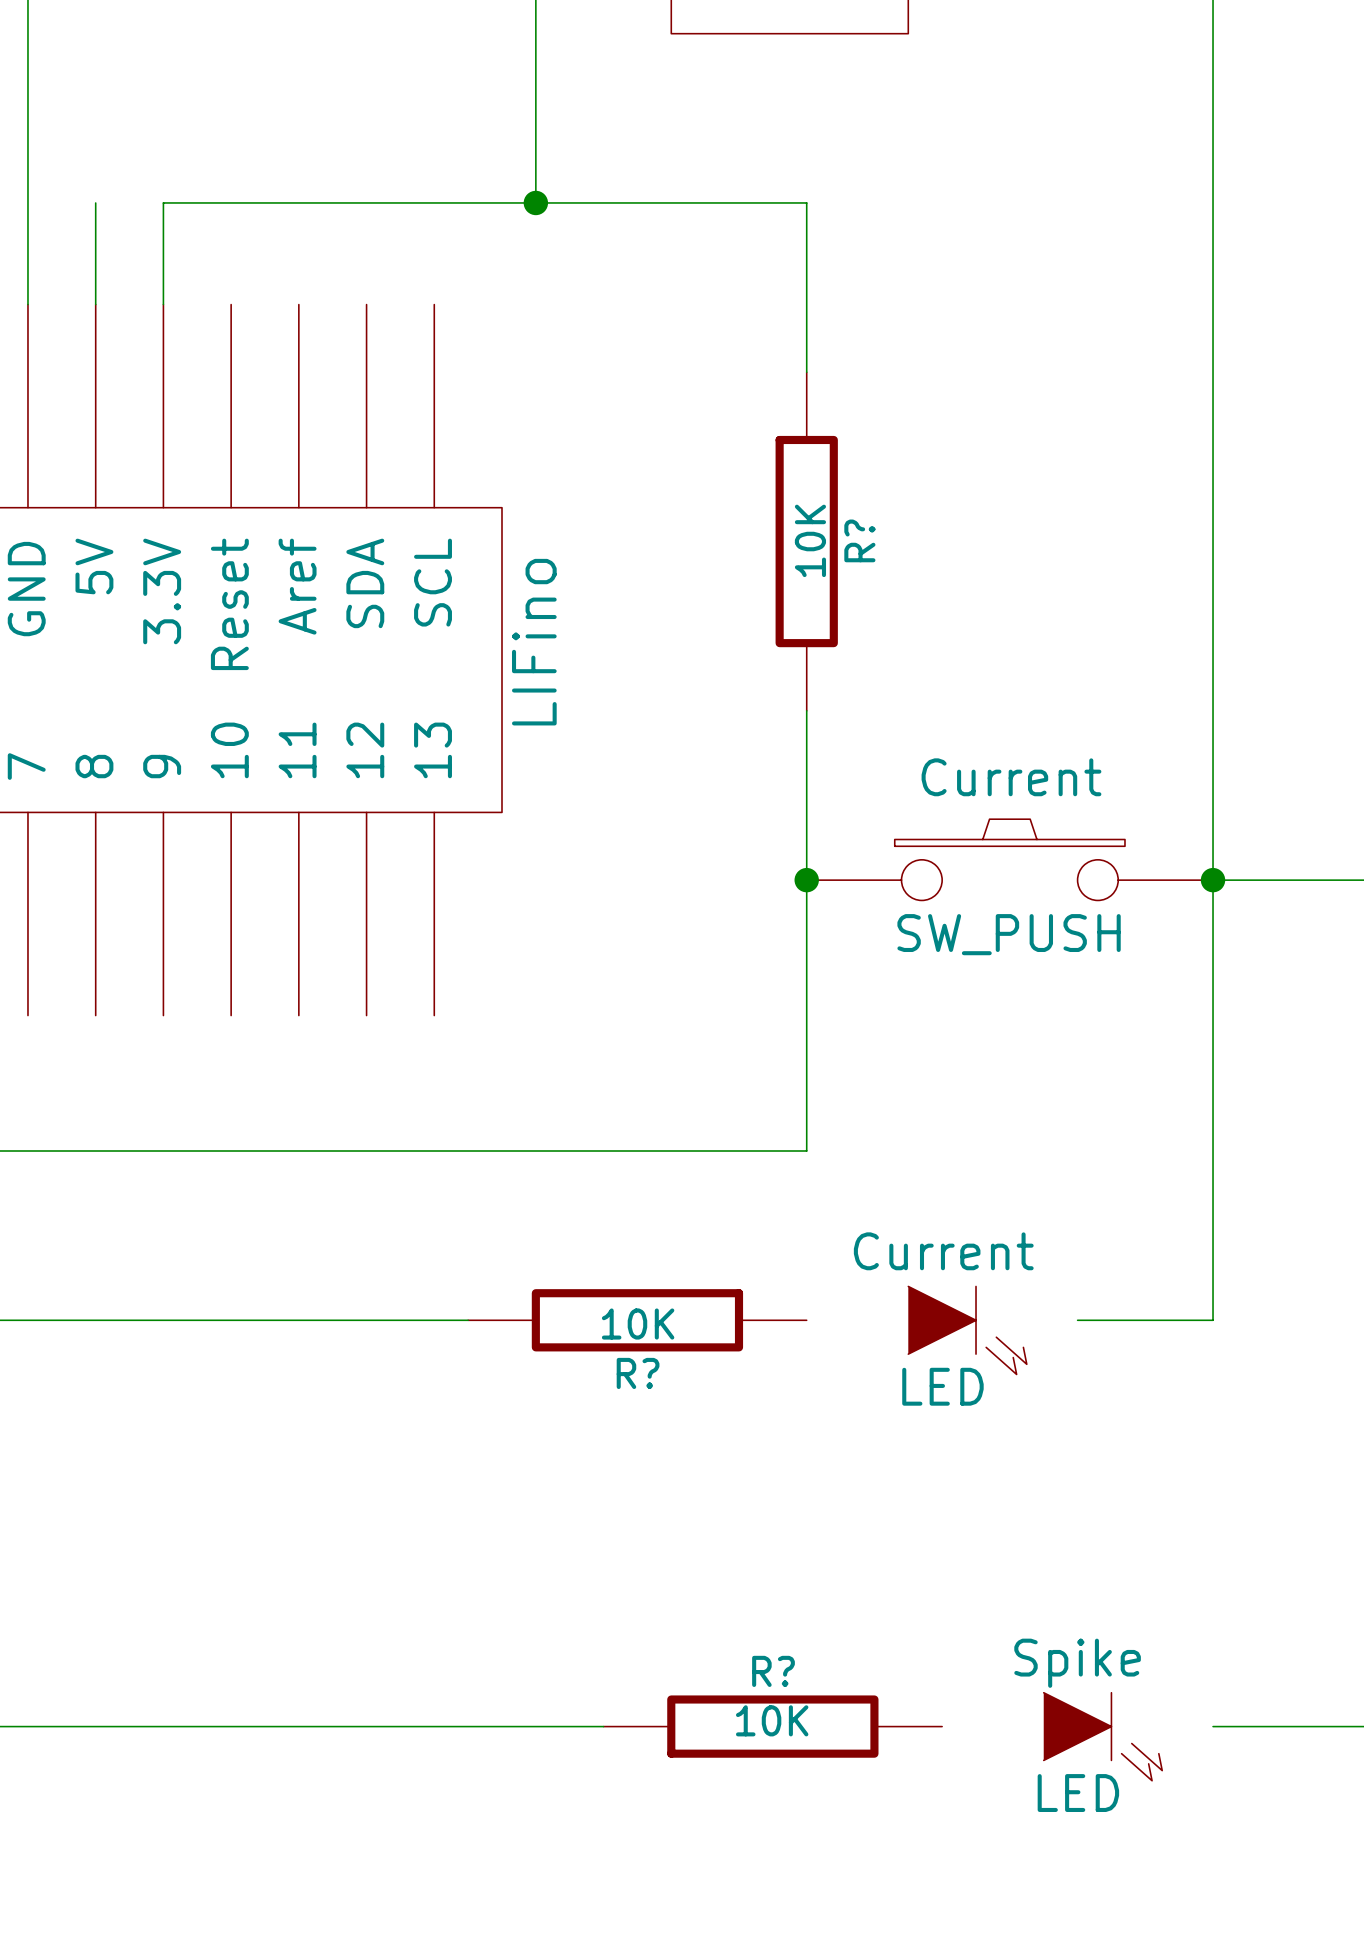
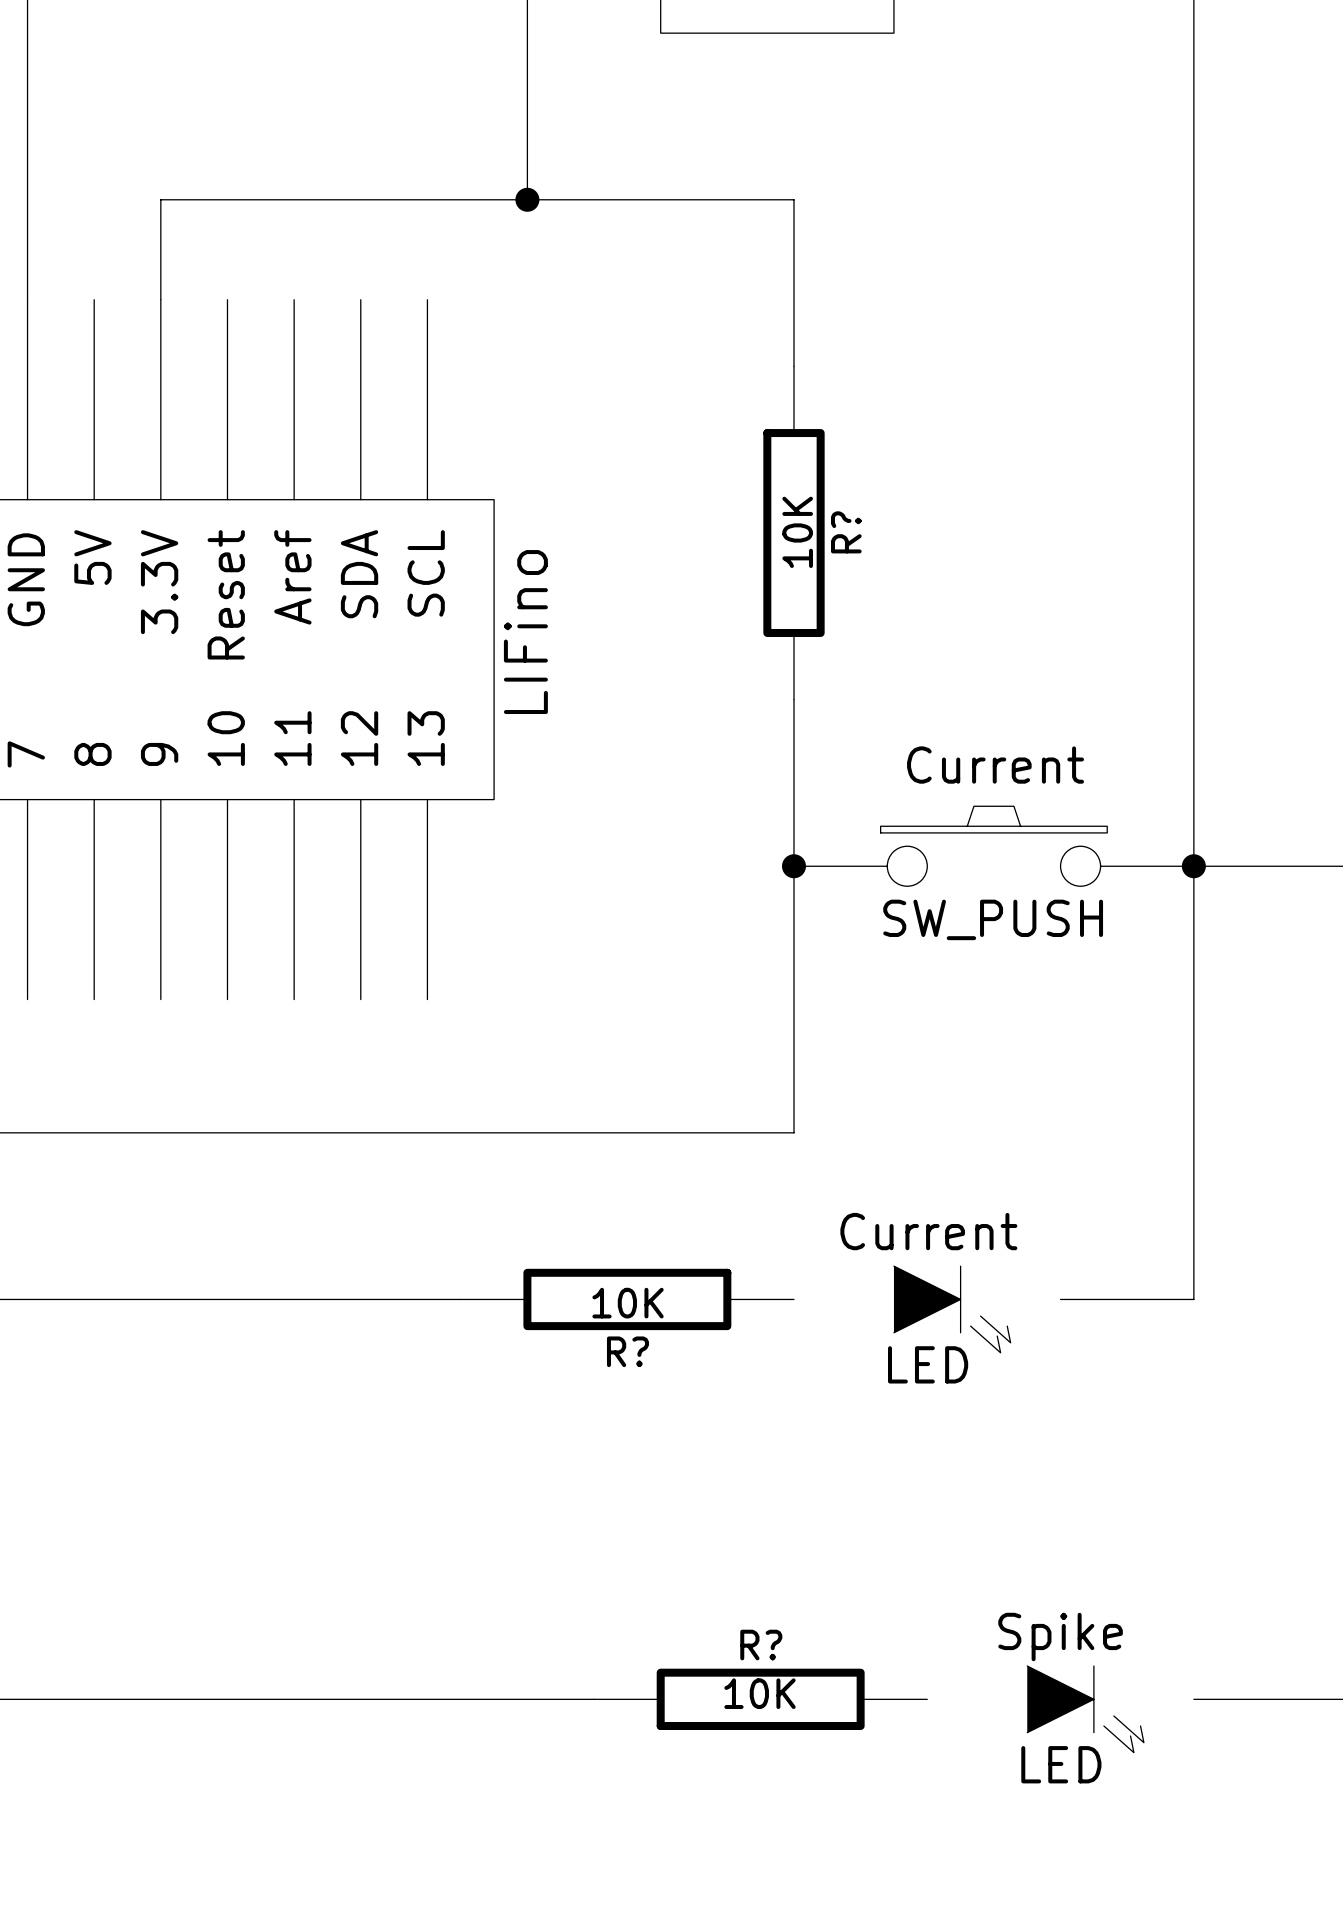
wire: (95, 202) (95, 304) -> none

